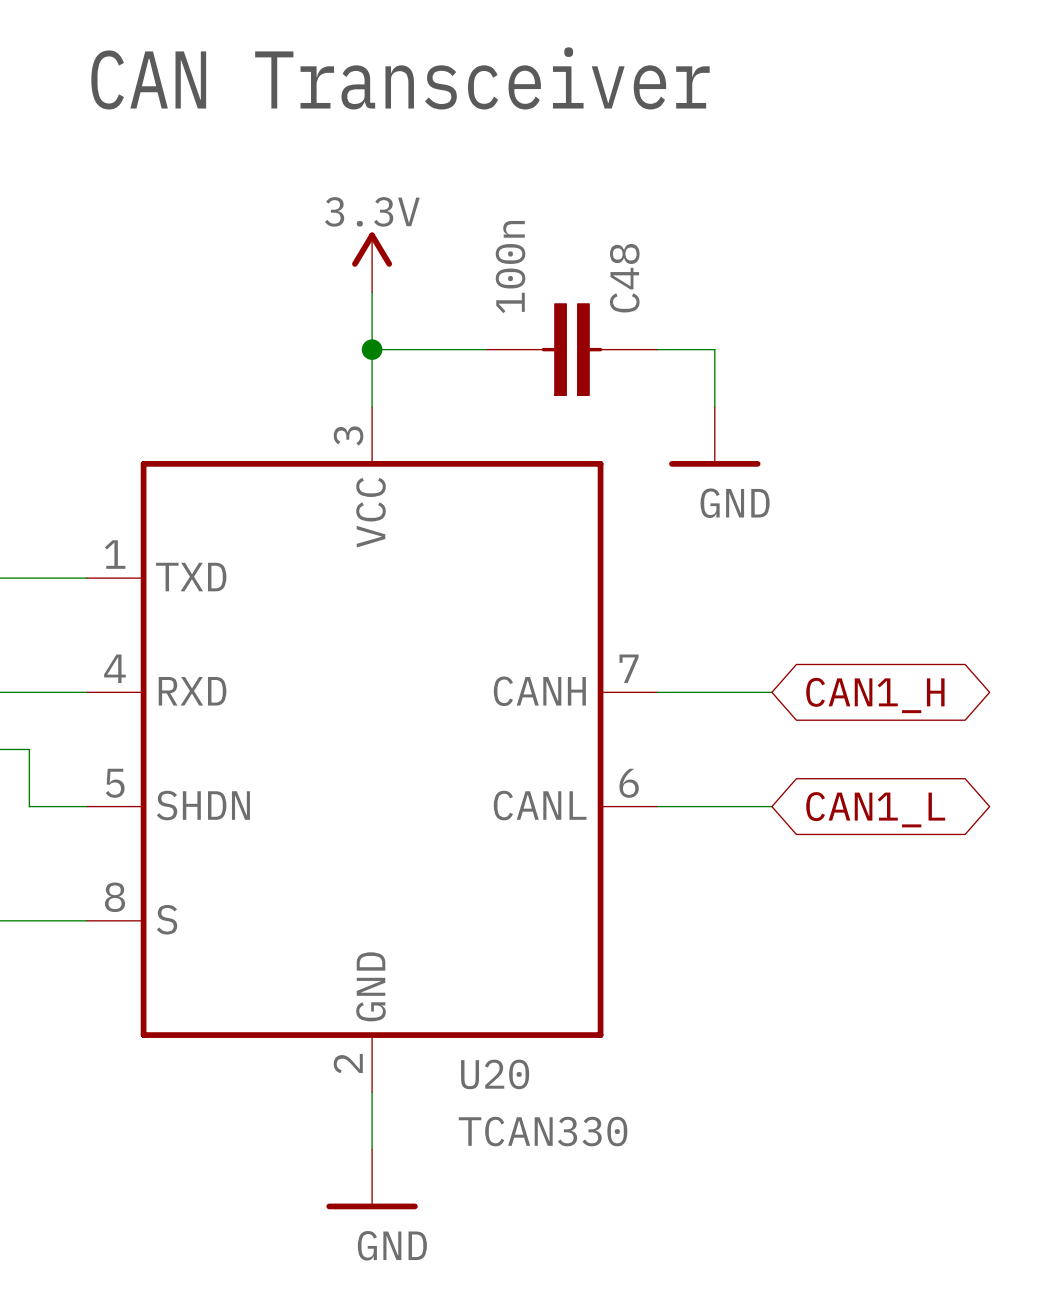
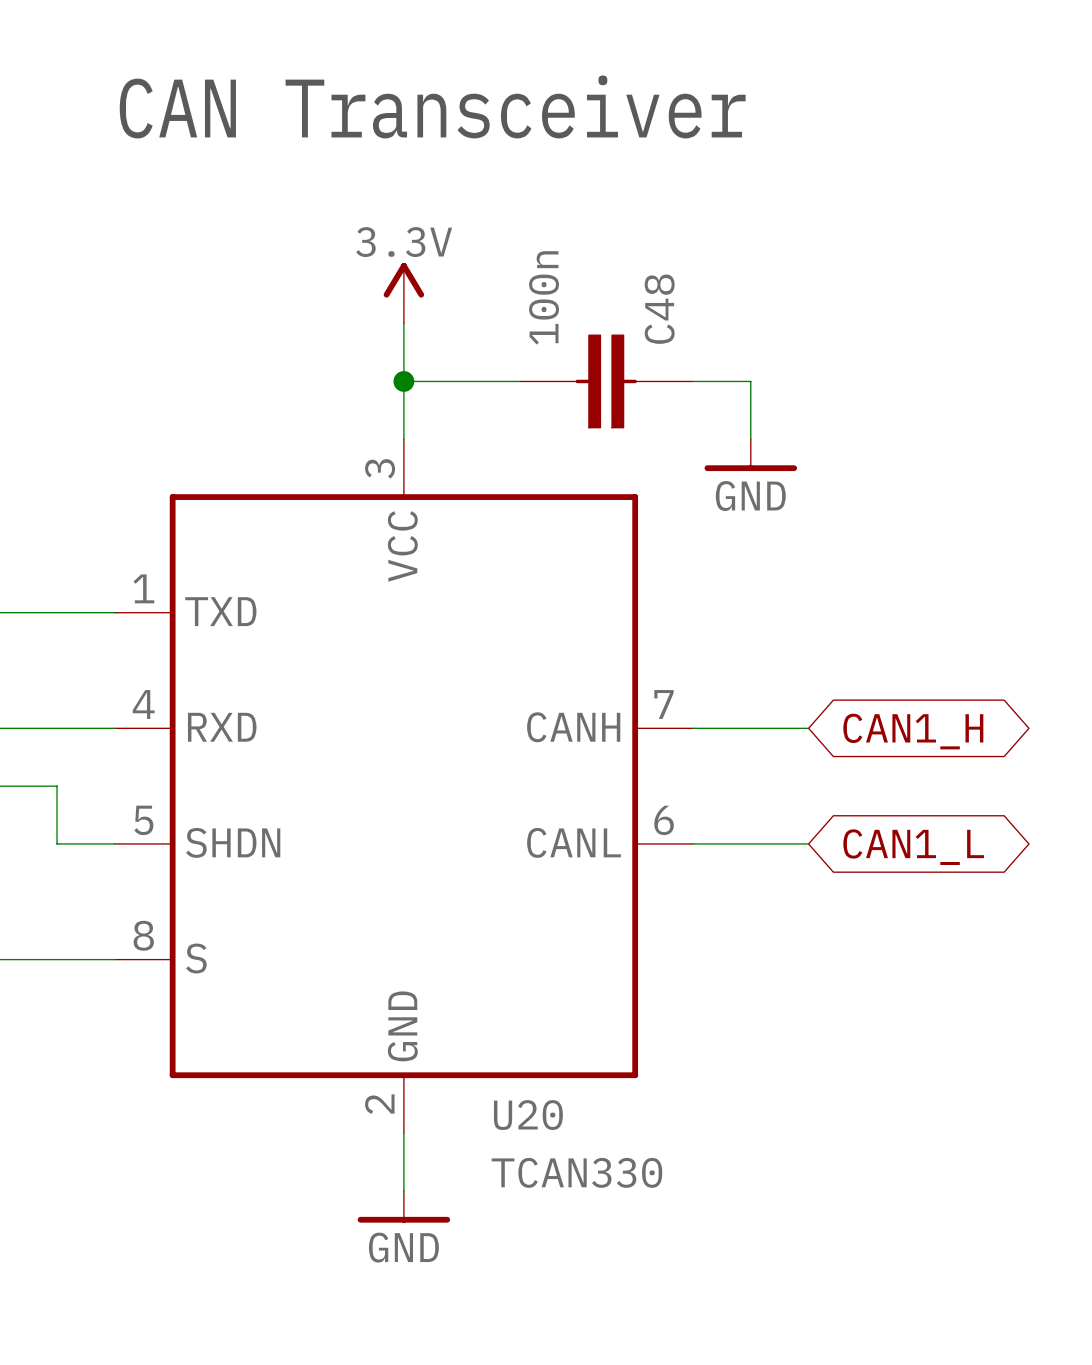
power symbol shape: [669, 406, 761, 467] -> [704, 439, 798, 472]
power symbol shape: [326, 1149, 418, 1210] -> [357, 1190, 451, 1223]

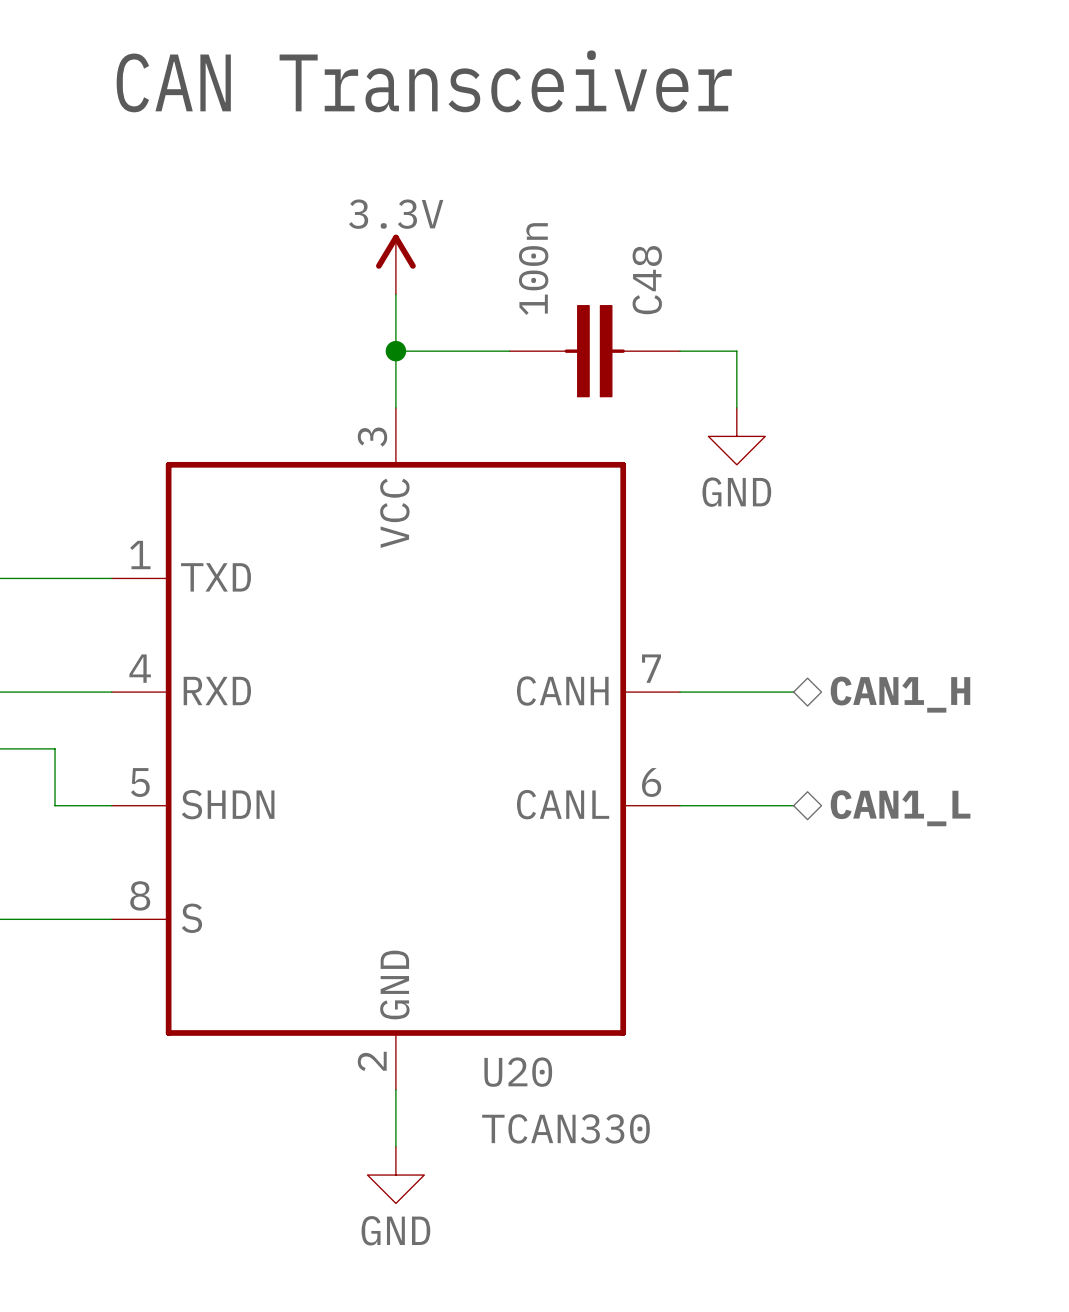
power symbol shape: [704, 439, 798, 472] -> [708, 407, 766, 465]
hierarchical label: none -> CAN1_H (900, 694)
global label: CAN1_H (913, 731) -> none
hierarchical label: none -> CAN1_L (900, 808)
global label: CAN1_L (913, 847) -> none
power symbol shape: [357, 1190, 451, 1223] -> [367, 1146, 425, 1204]

